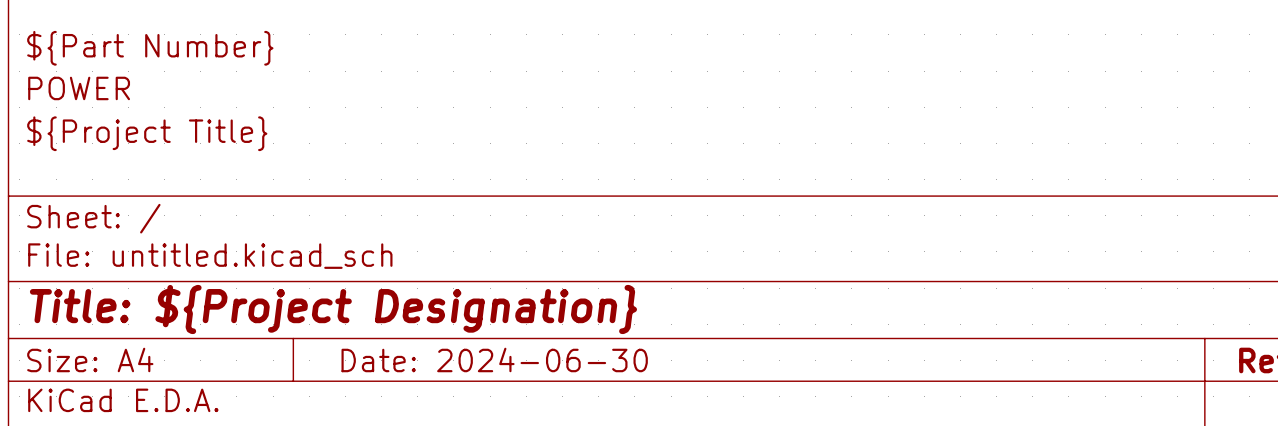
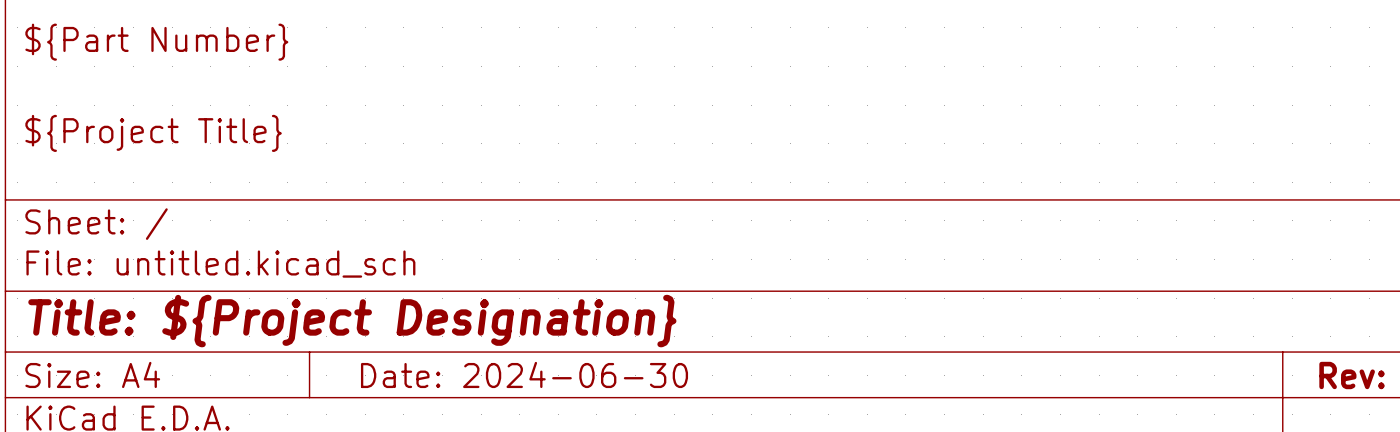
title block: POWER (79, 88) -> none

